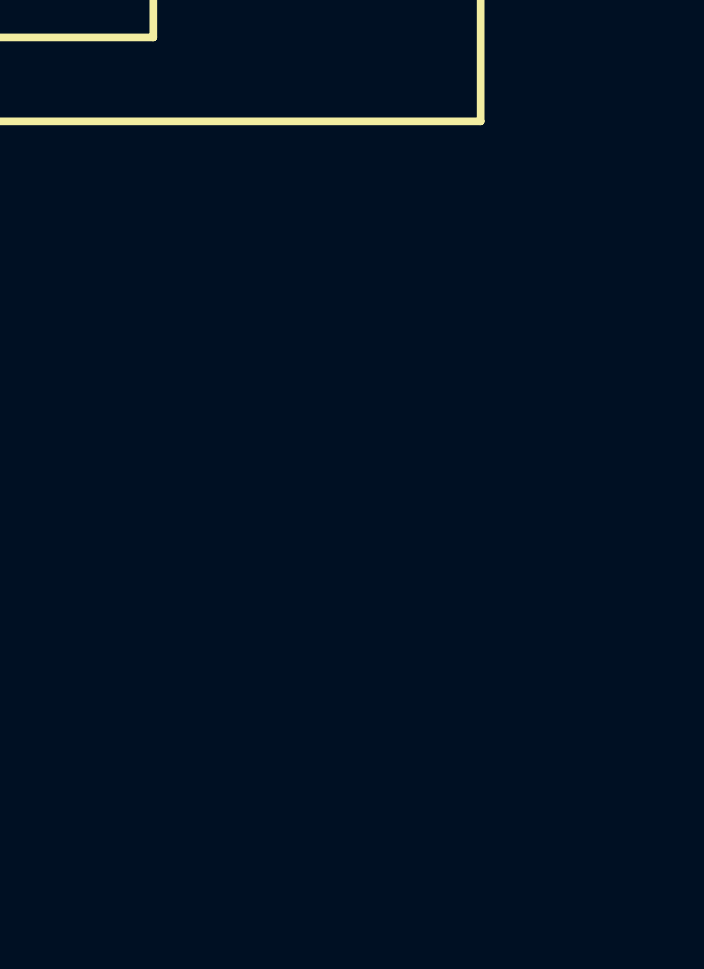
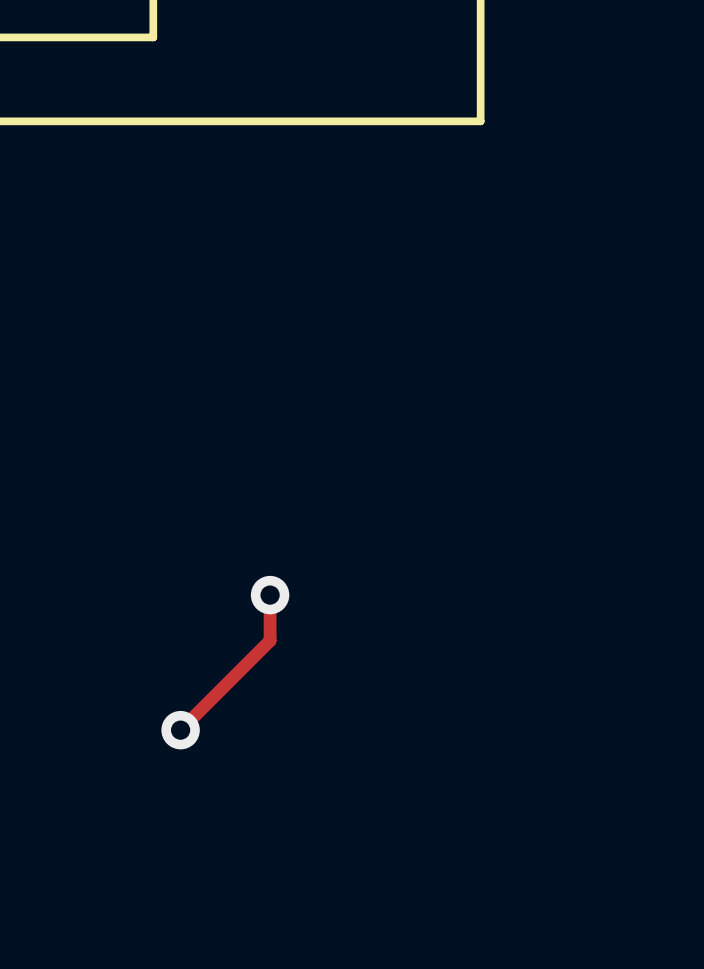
track: none -> (270, 595) (270, 640) (180, 730)
via: none -> (270, 595)
via: none -> (180, 730)

